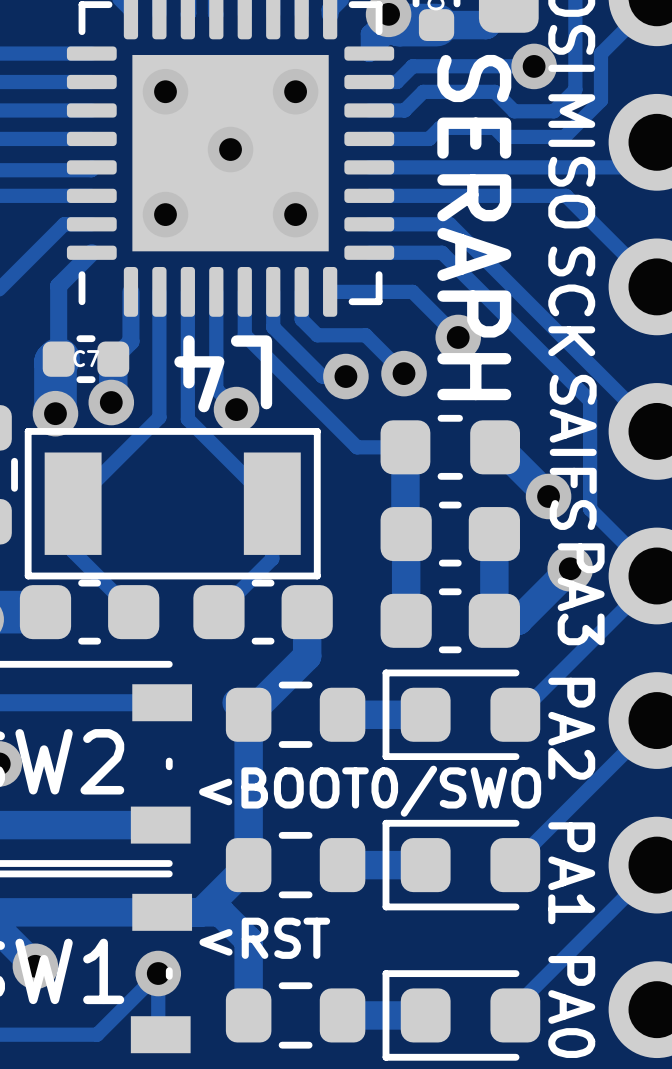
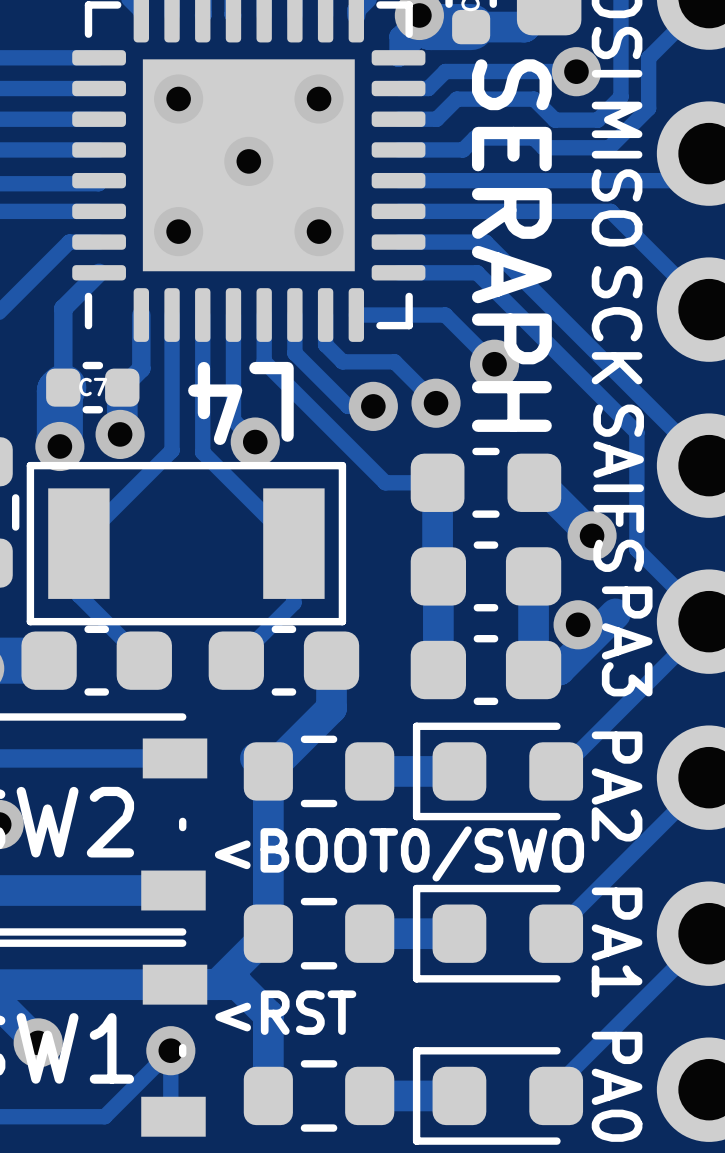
via position: (570, 568) -> (578, 624)

